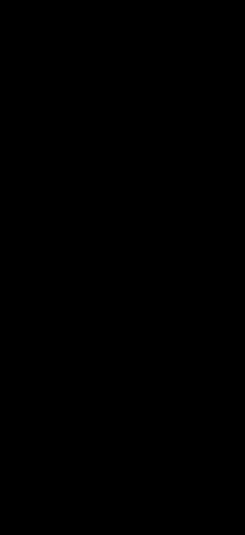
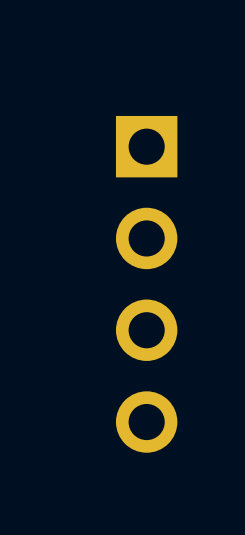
part: none -> (146, 284)

